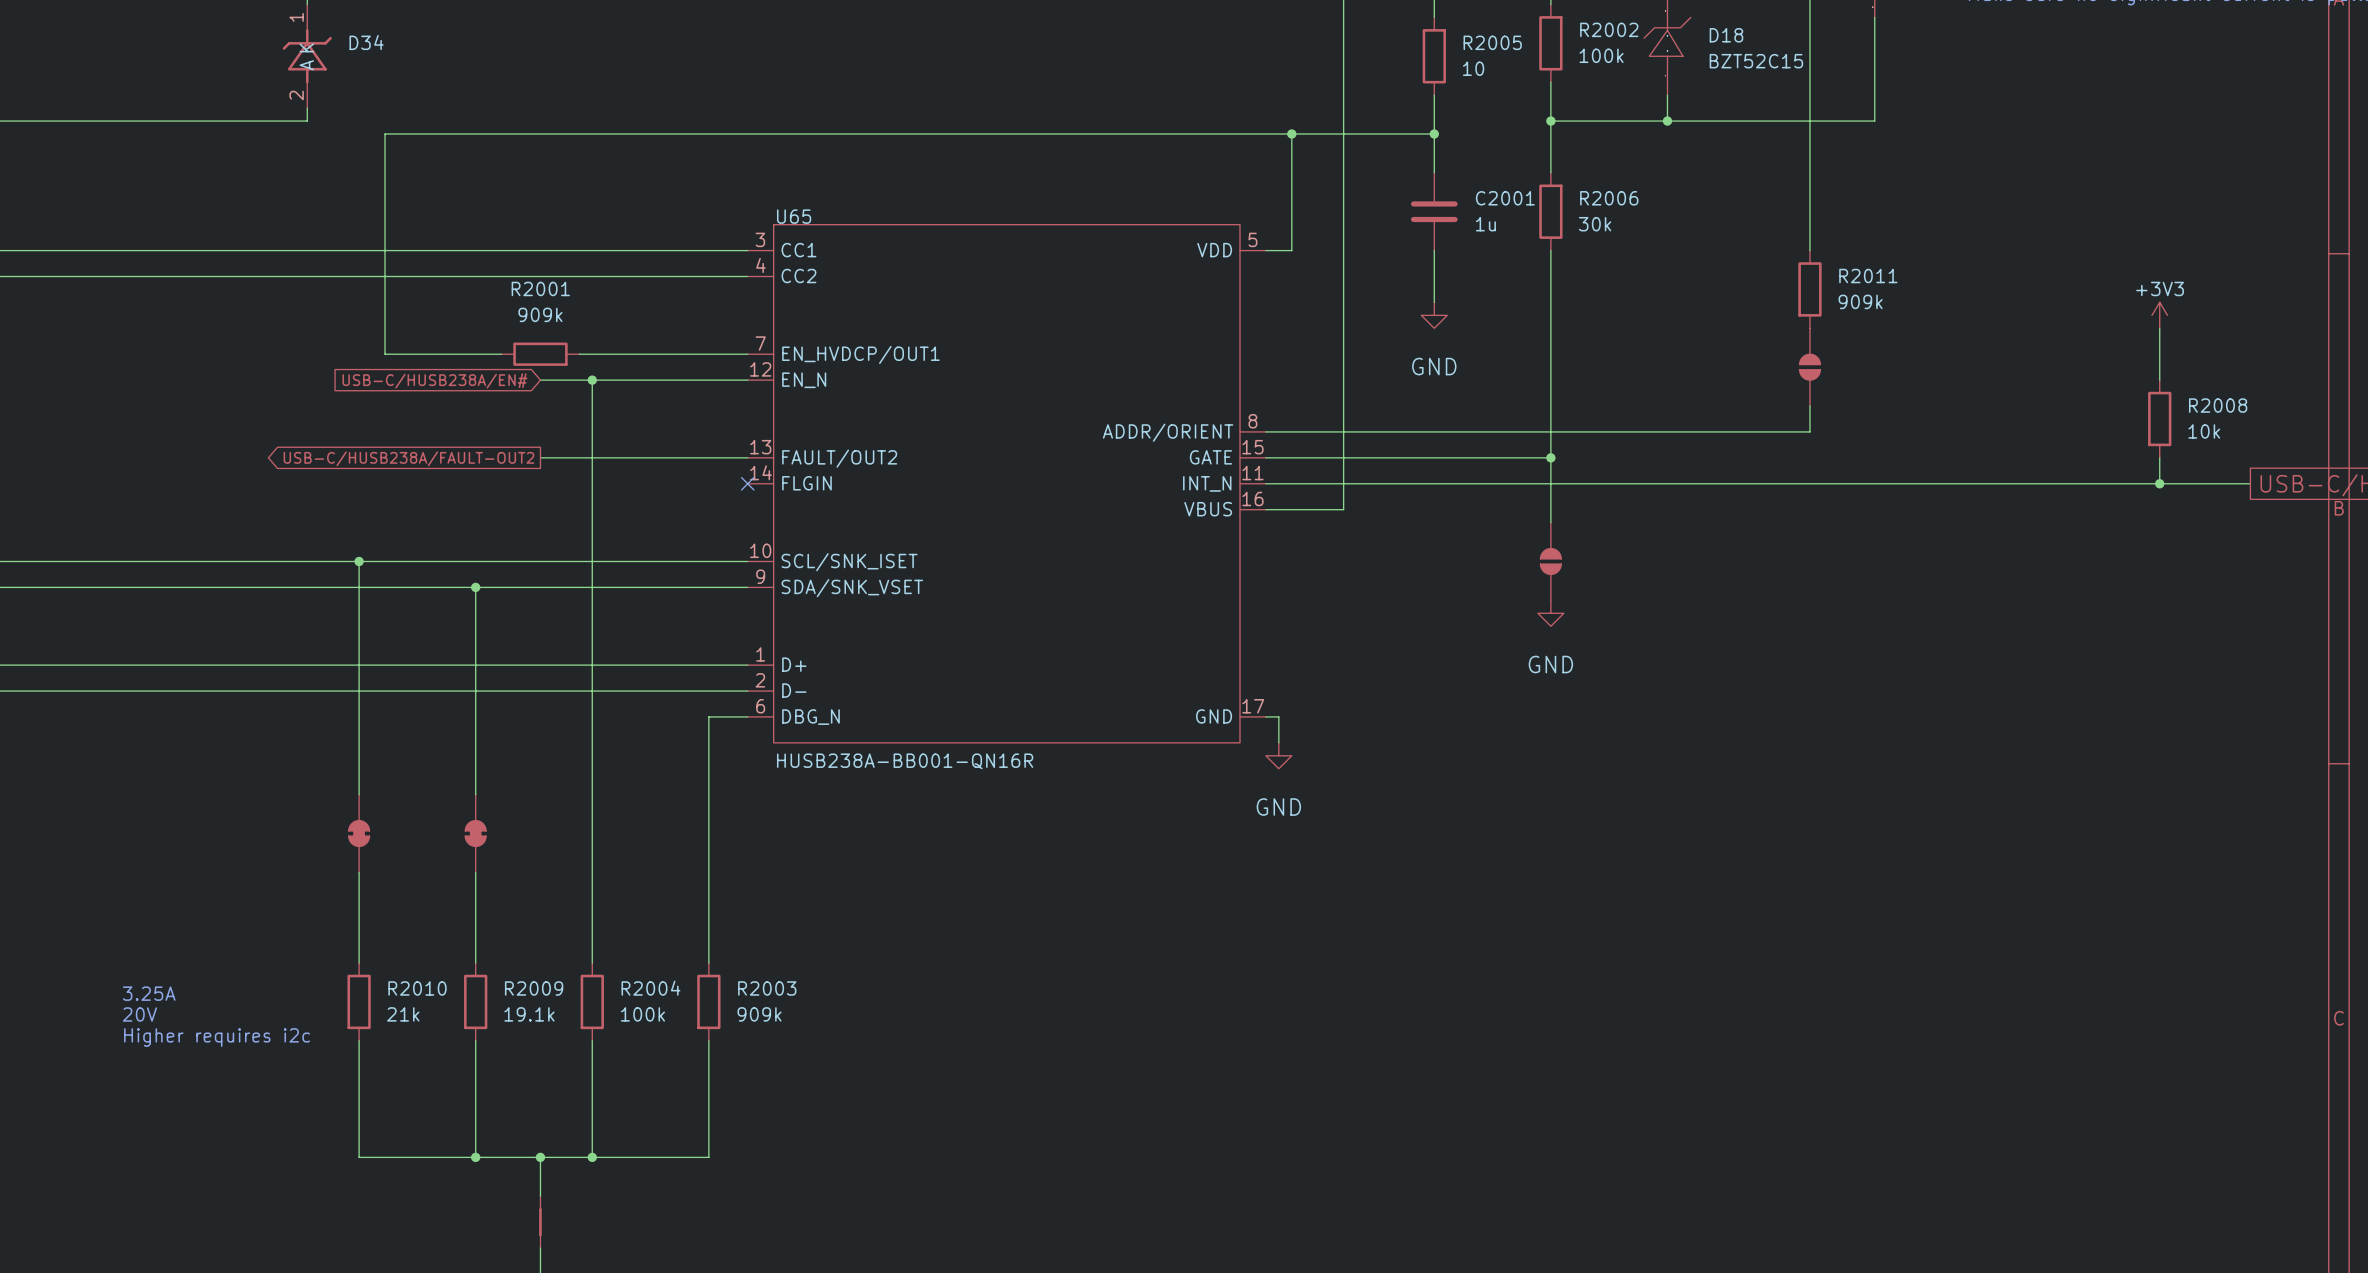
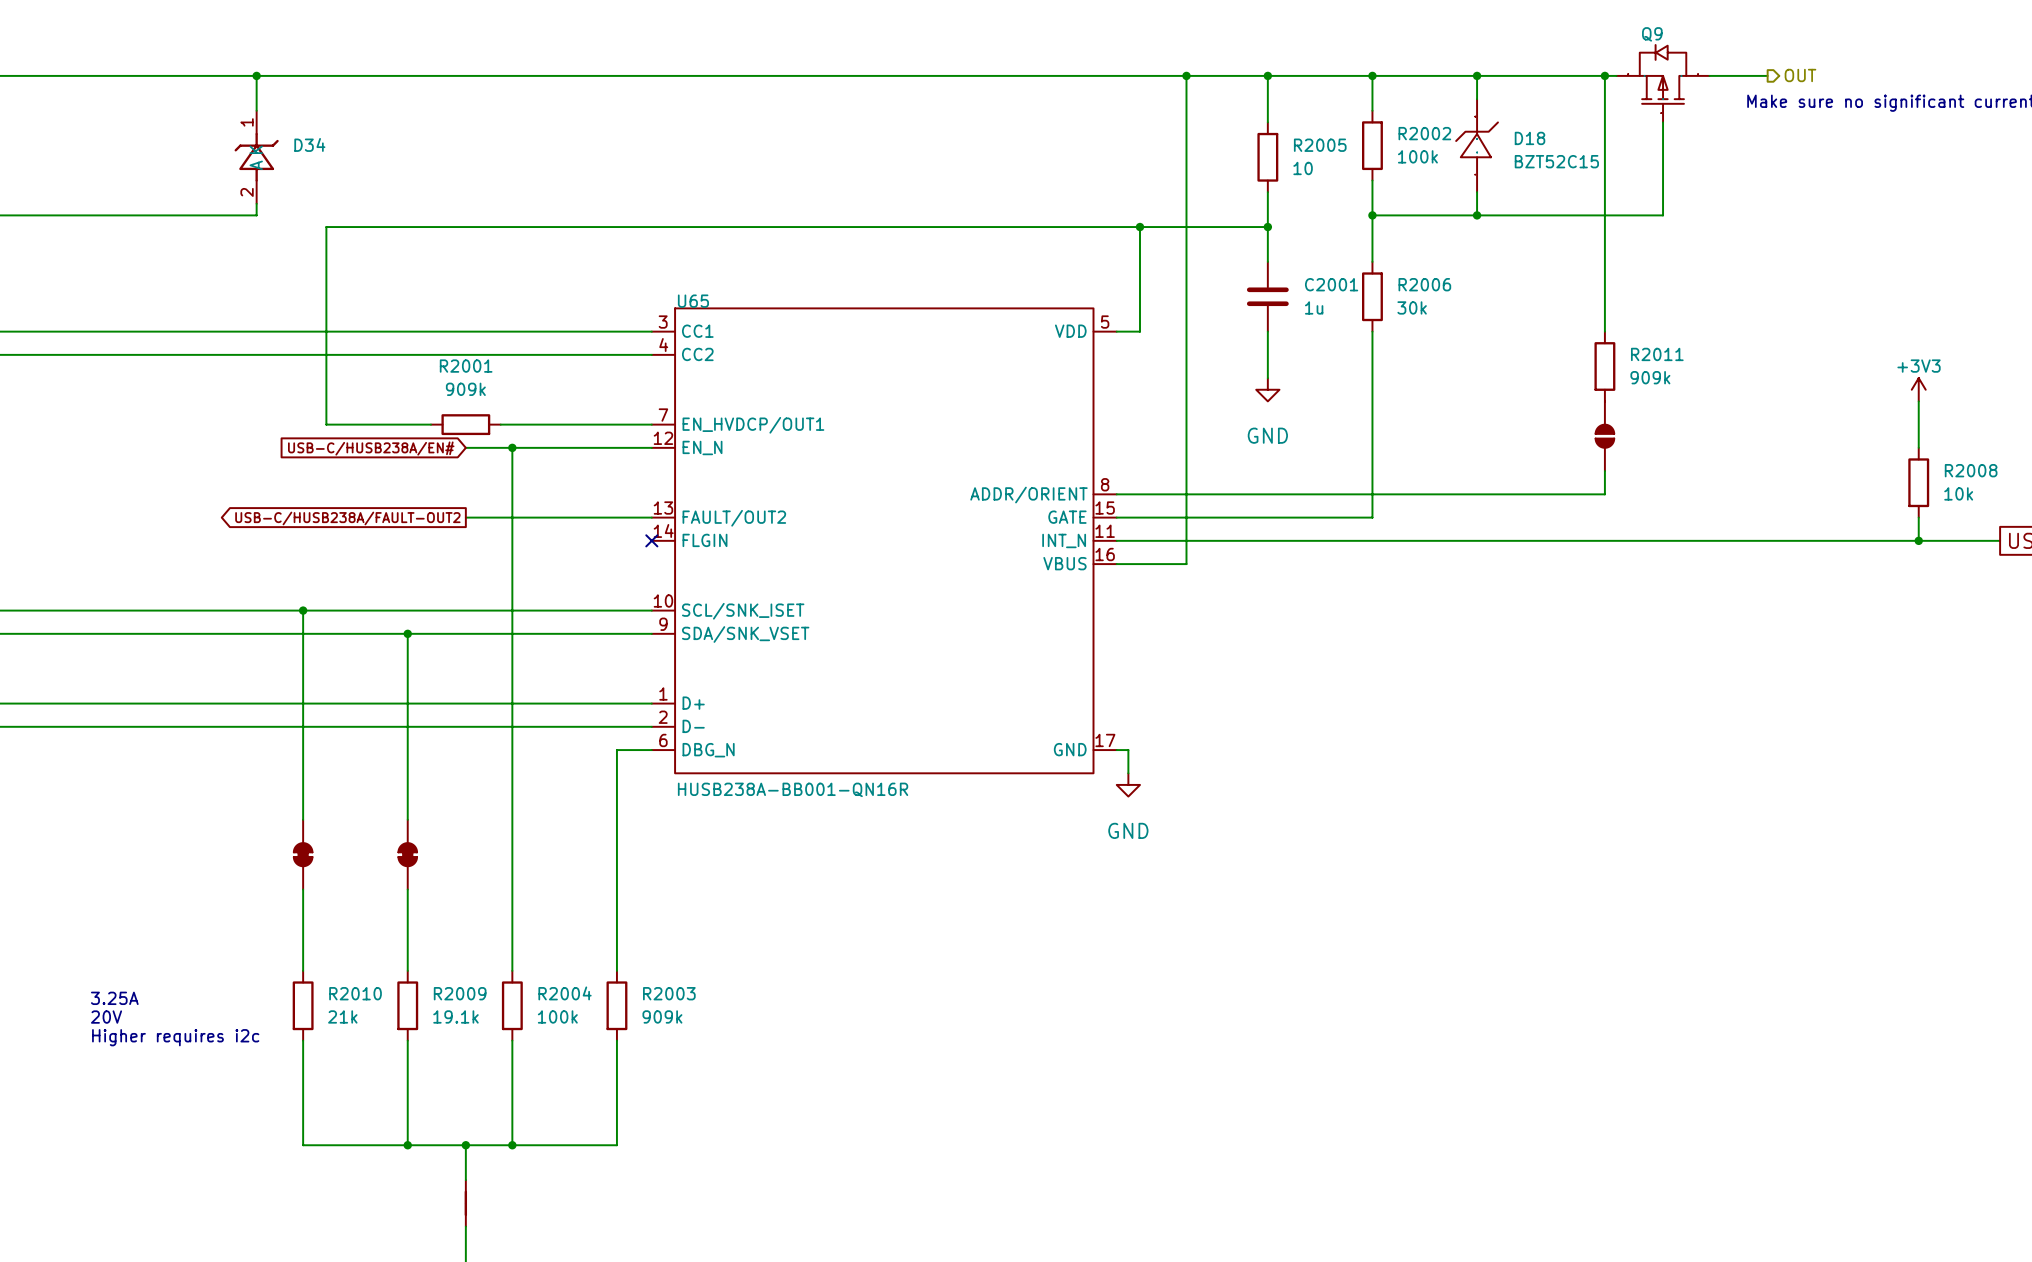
wire: (1550, 457) (1550, 522) -> none
junction: (1550, 457) -> none
part: (1550, 561) -> none
power symbol: GND (1550, 613) -> none

